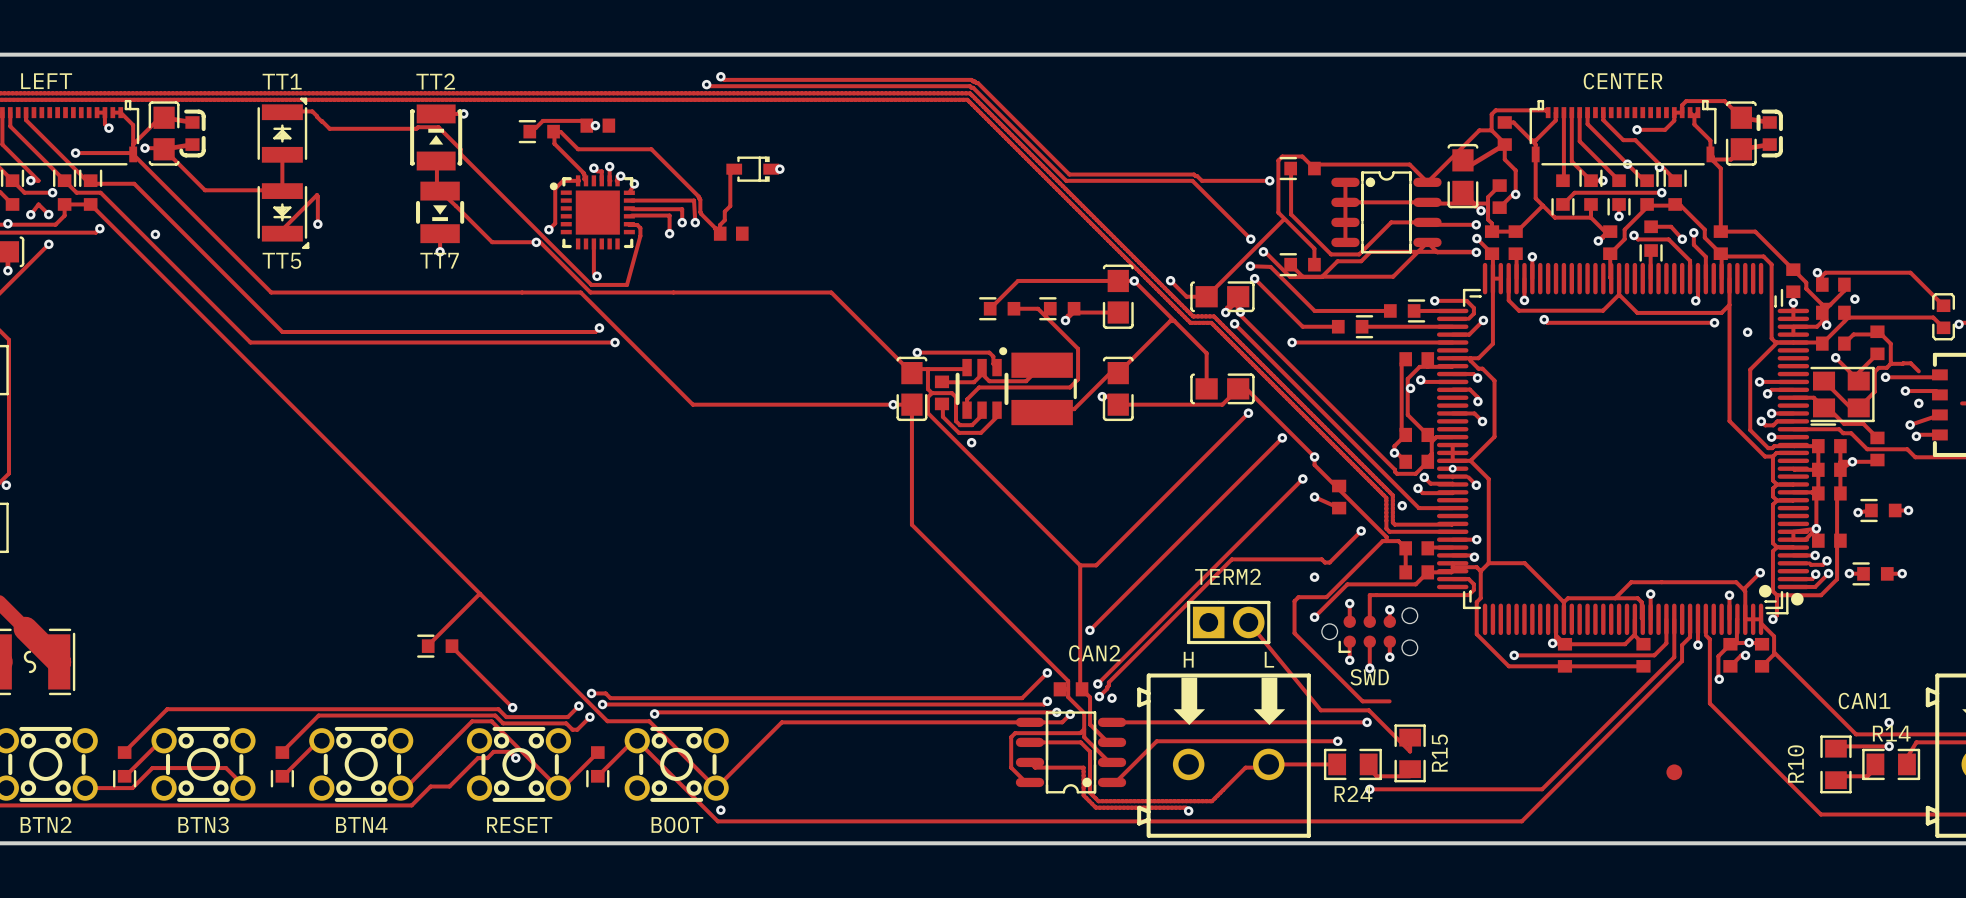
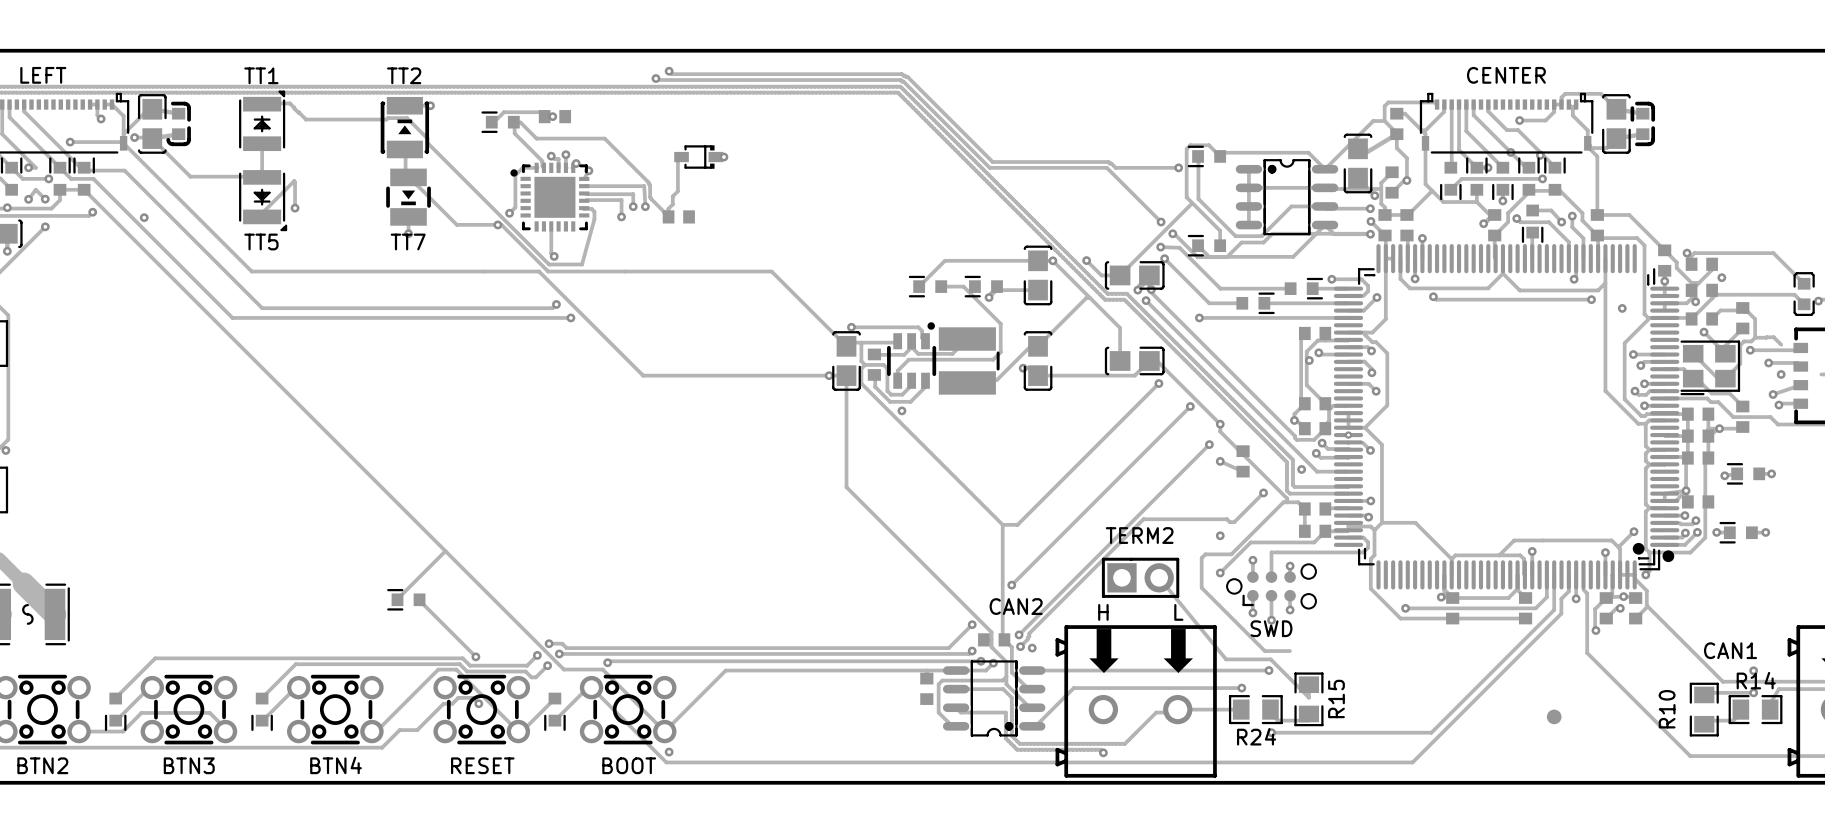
part: none -> (926, 688)

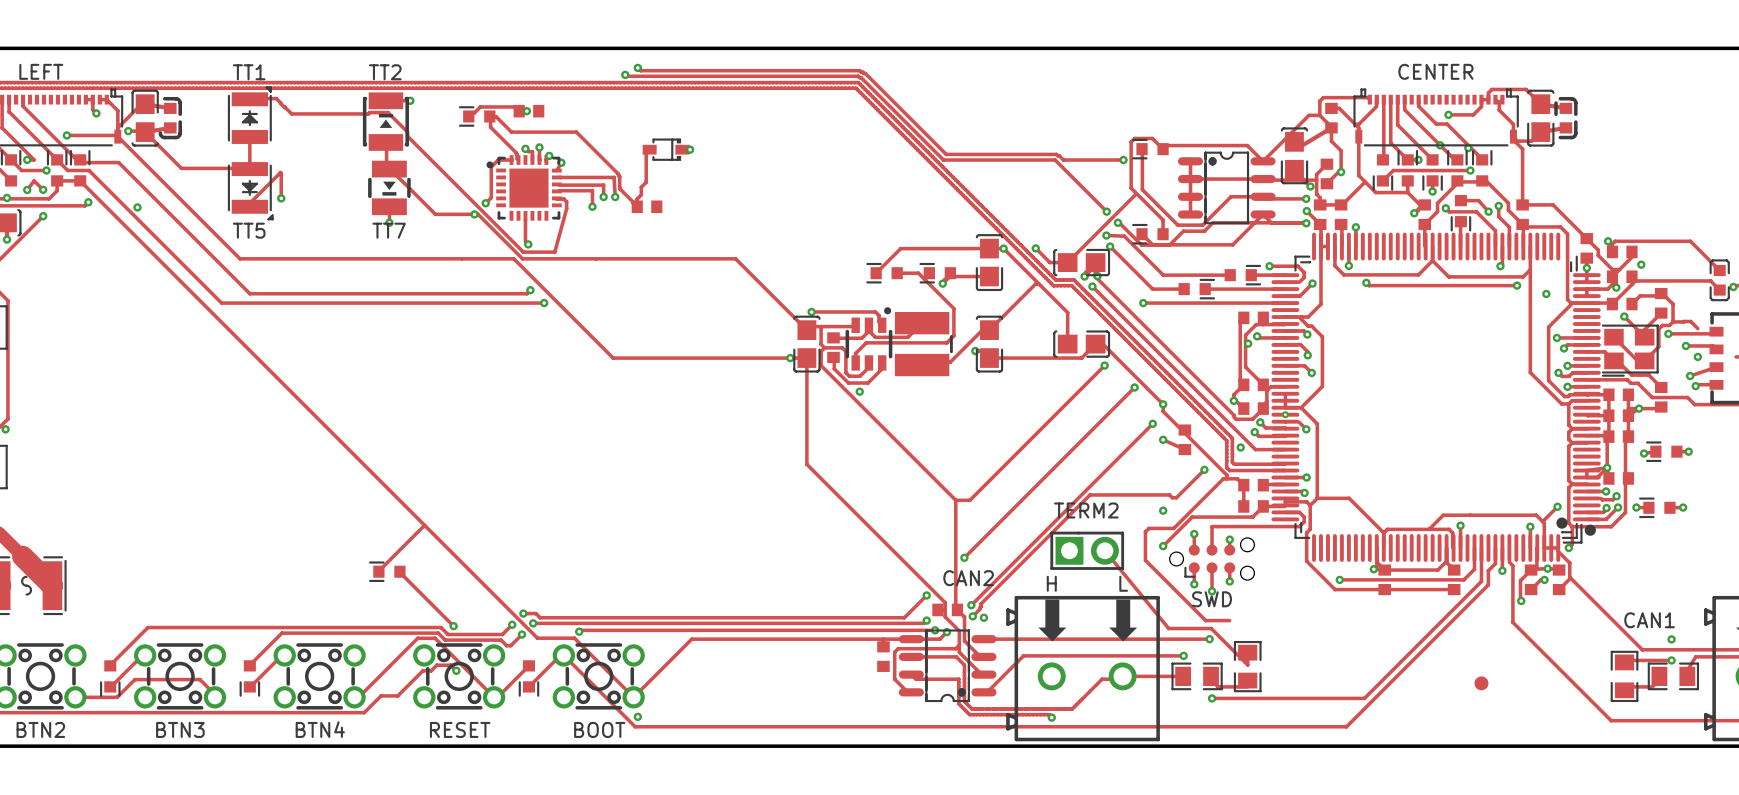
R14 name: R14 (1756, 680) -> none
R15 name: R15 (1336, 698) -> none
R10 name: R10 (1667, 709) -> none
R24 name: R24 (1256, 736) -> none

